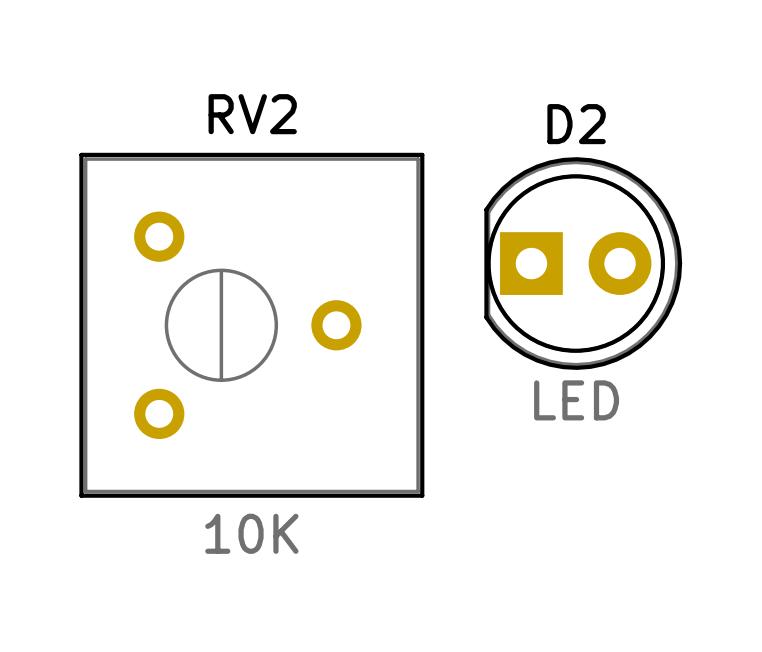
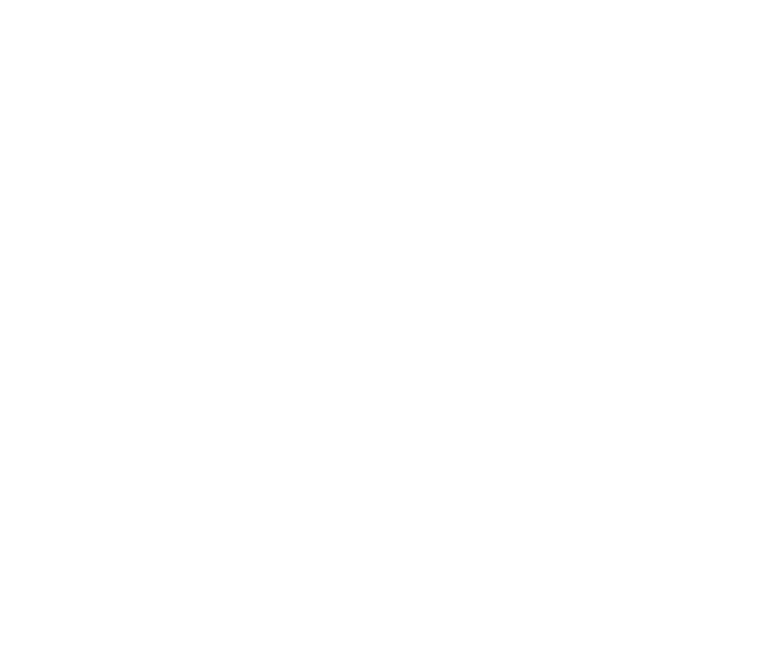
D2: LED (583, 263) -> none
RV2: 10K (251, 325) -> none

